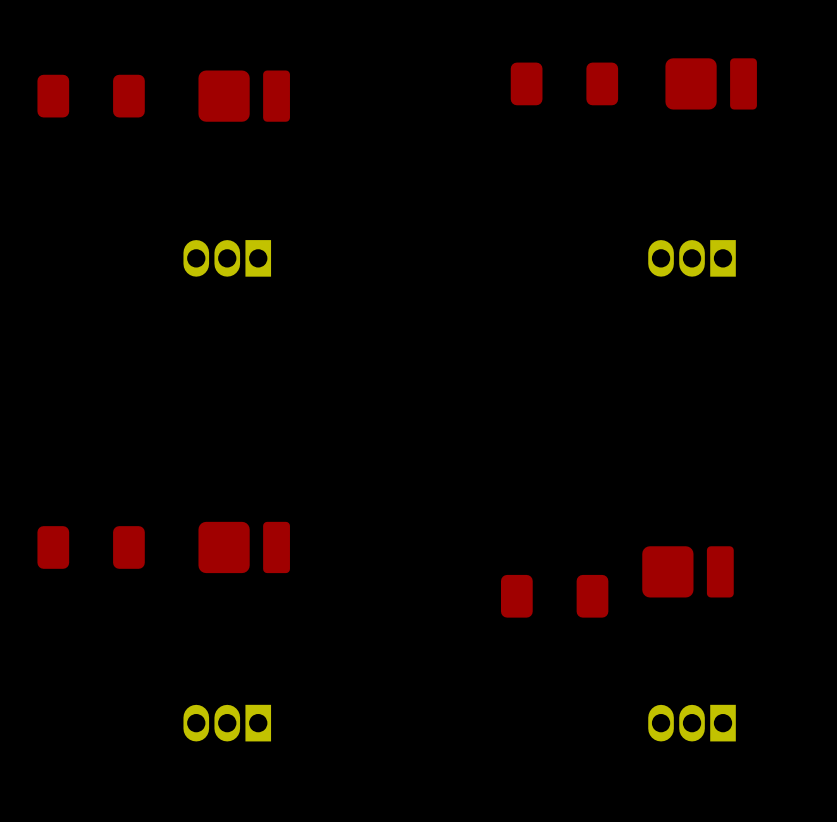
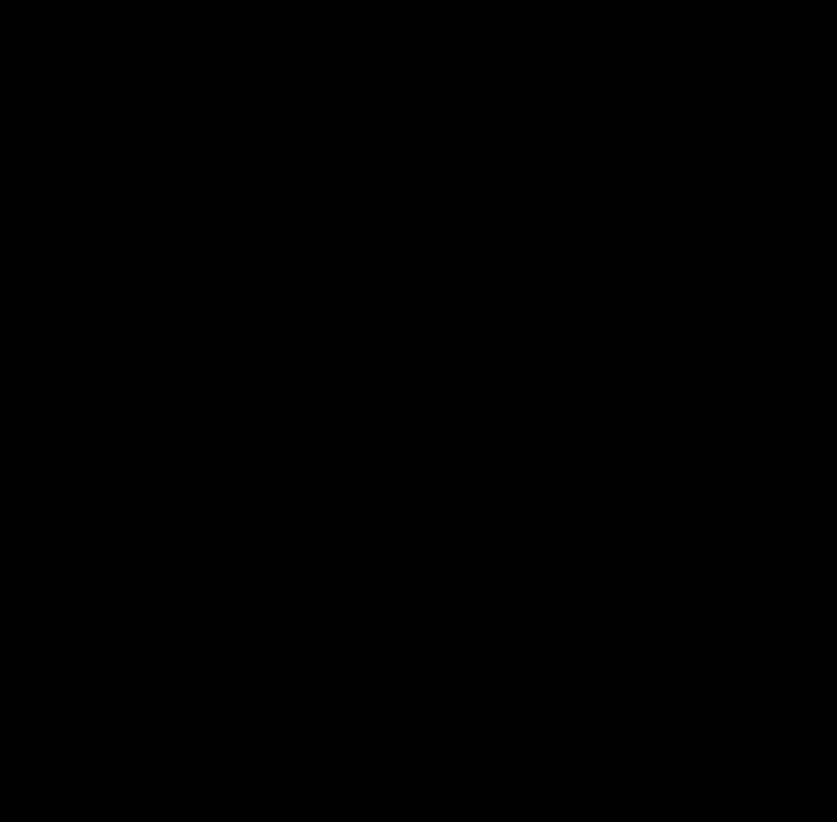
part: (564, 83) -> none
part: (711, 83) -> none
part: (91, 96) -> none
part: (244, 96) -> none
part: (227, 258) -> none
part: (692, 258) -> none
part: (91, 547) -> none
part: (244, 547) -> none
part: (688, 571) -> none
part: (554, 596) -> none
part: (227, 723) -> none
part: (692, 723) -> none

